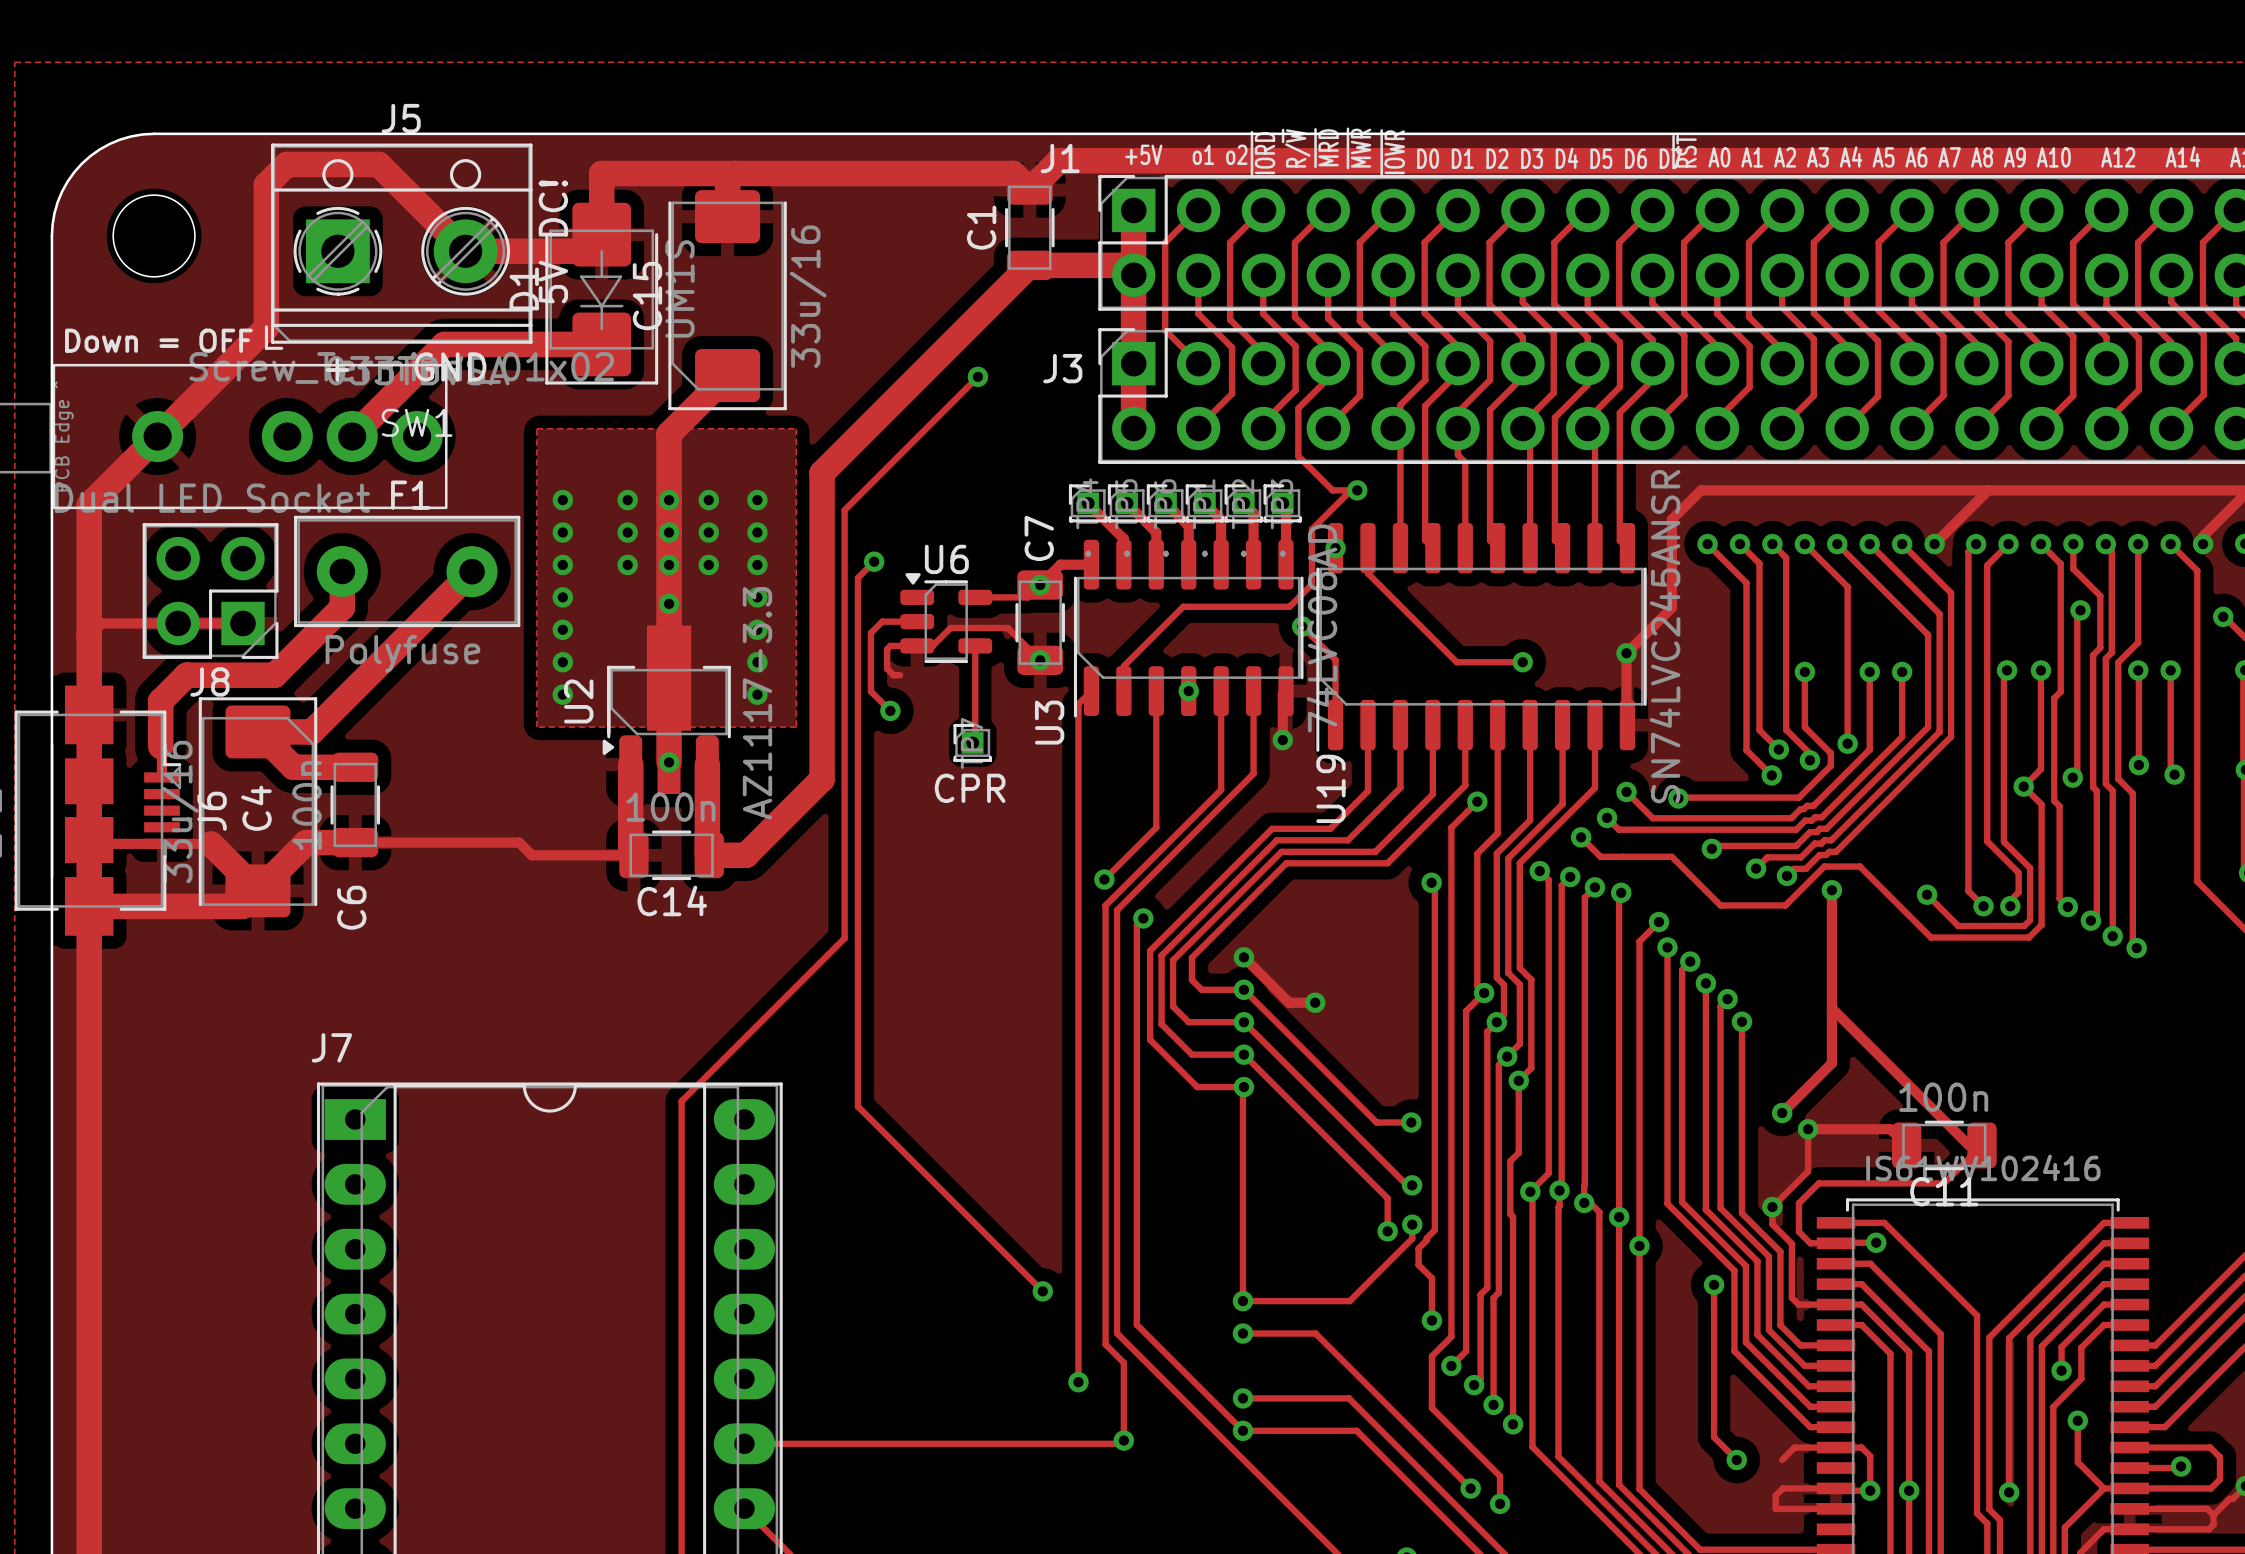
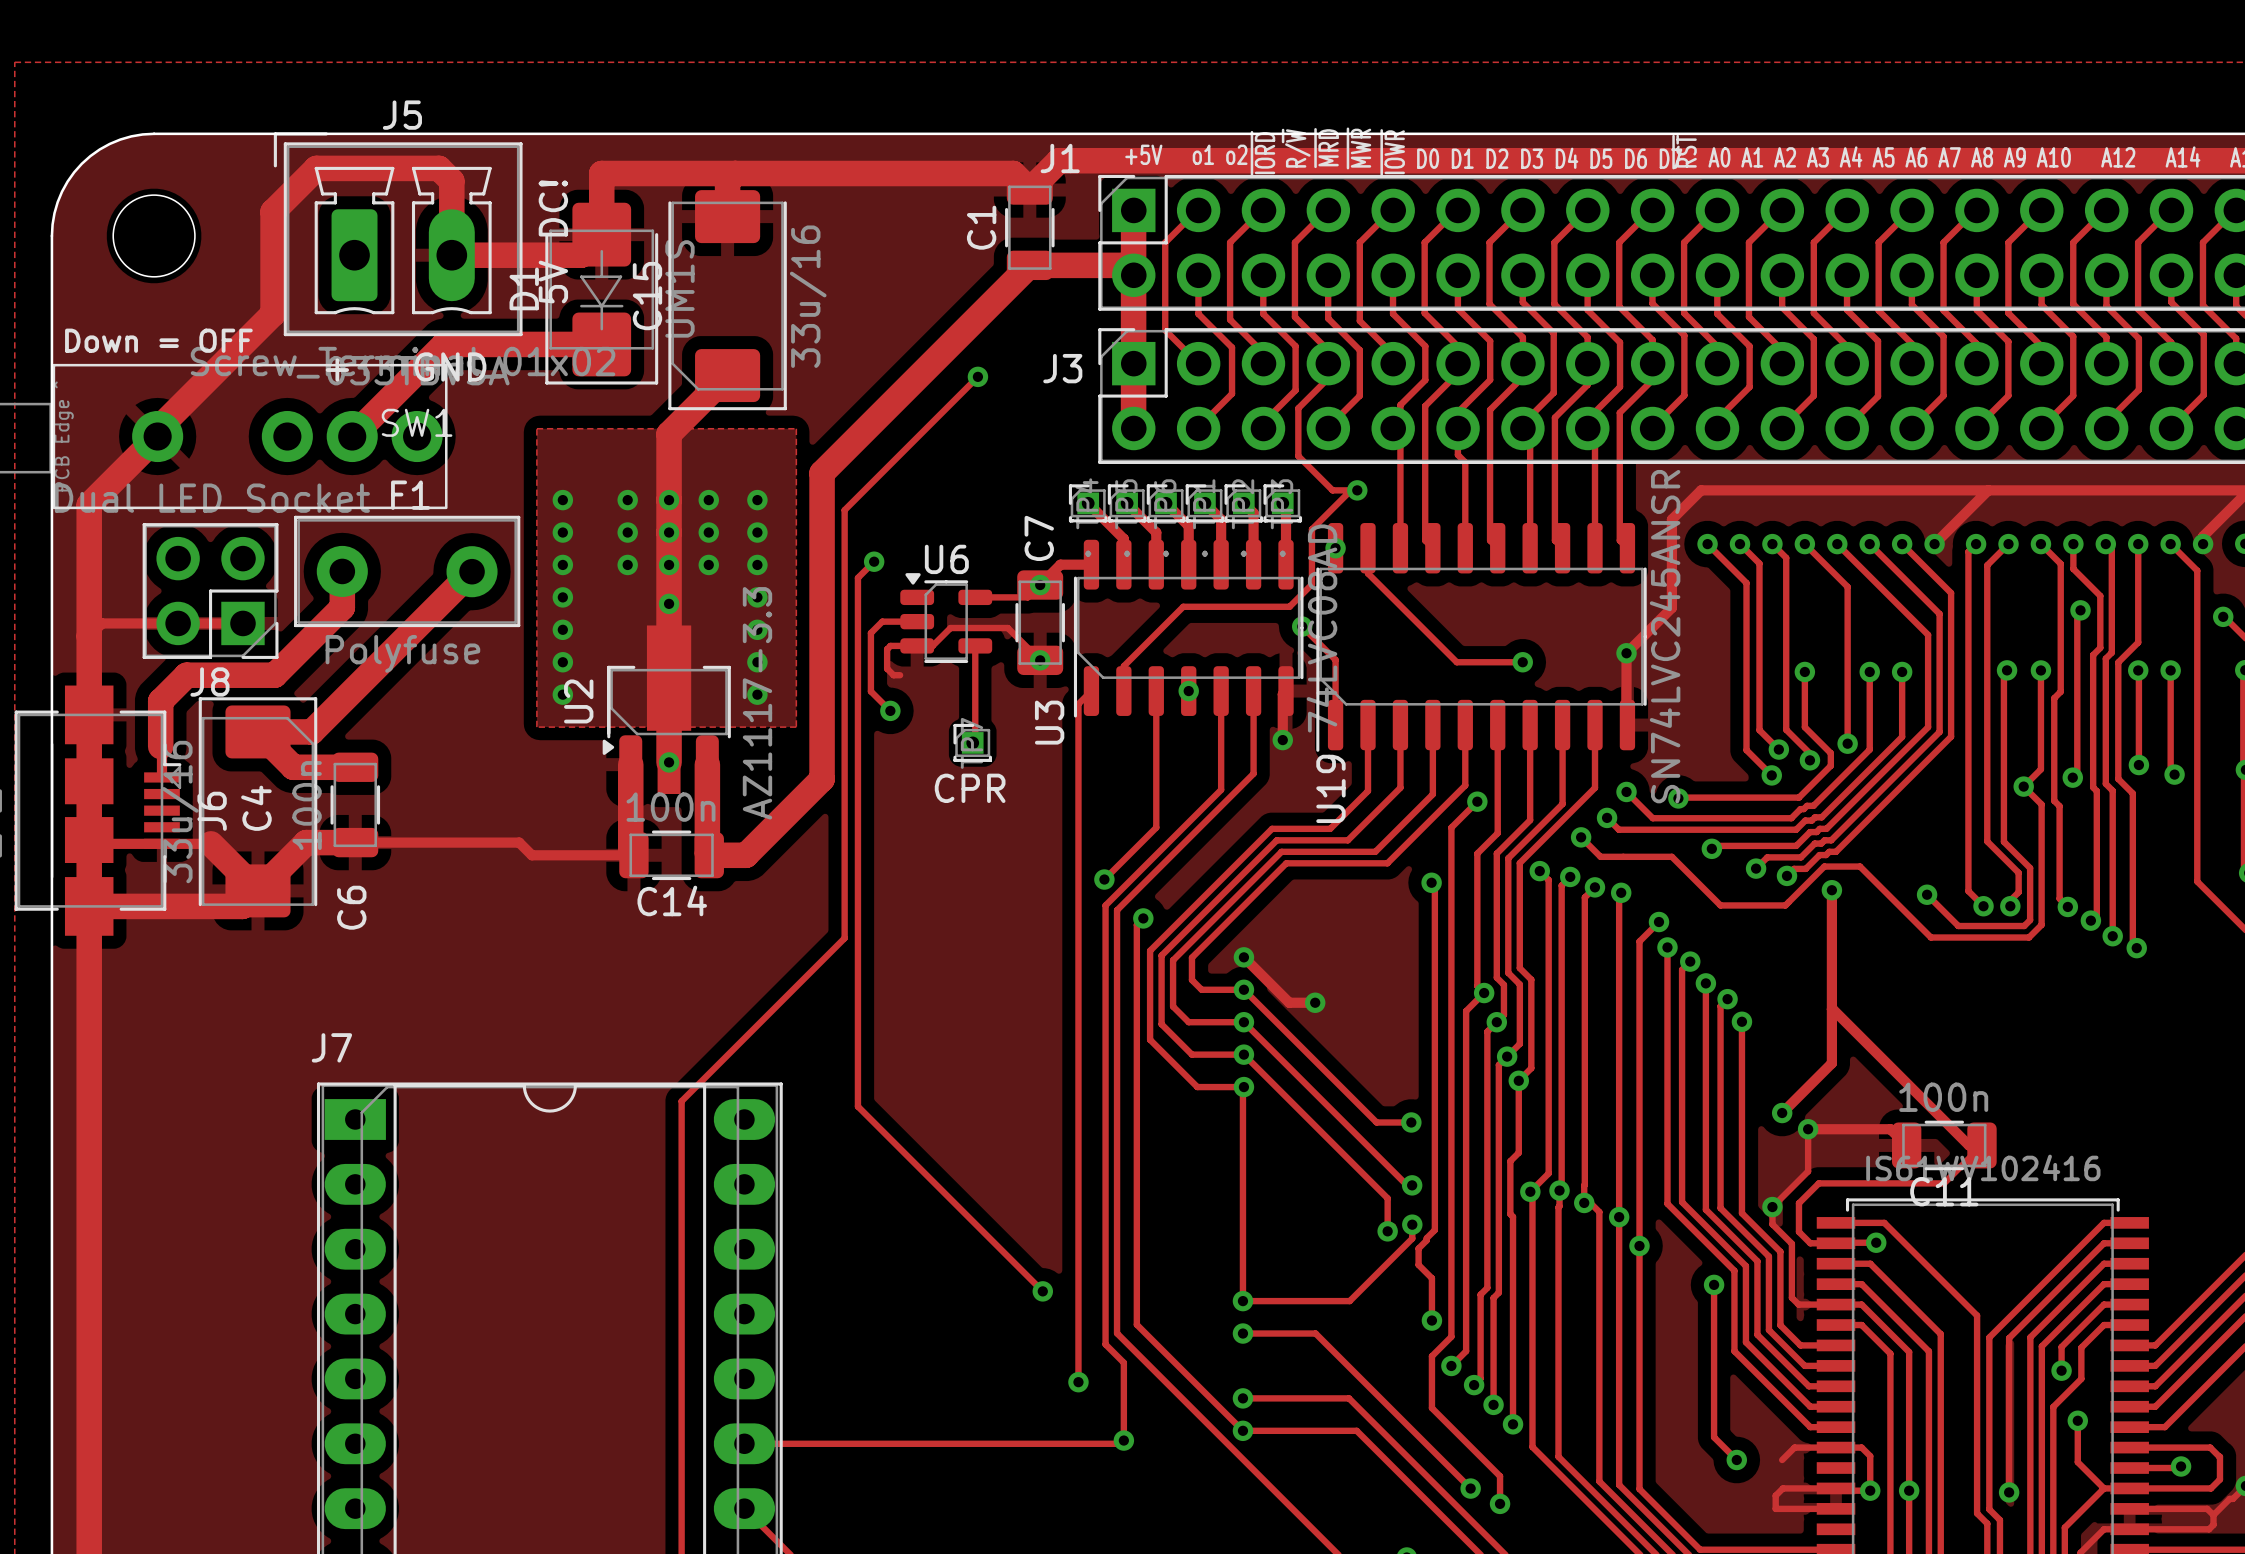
J5 footprint: [264, 143, 533, 350] -> [273, 132, 523, 337]
track: (585, 251) (465, 251) (378, 164) (286, 164) (266, 184) (266, 327) (157, 436) -> (585, 251) (581, 255) (451, 255) (451, 181) (439, 168) (316, 168) (273, 211) (273, 313) (157, 429) (157, 436)

